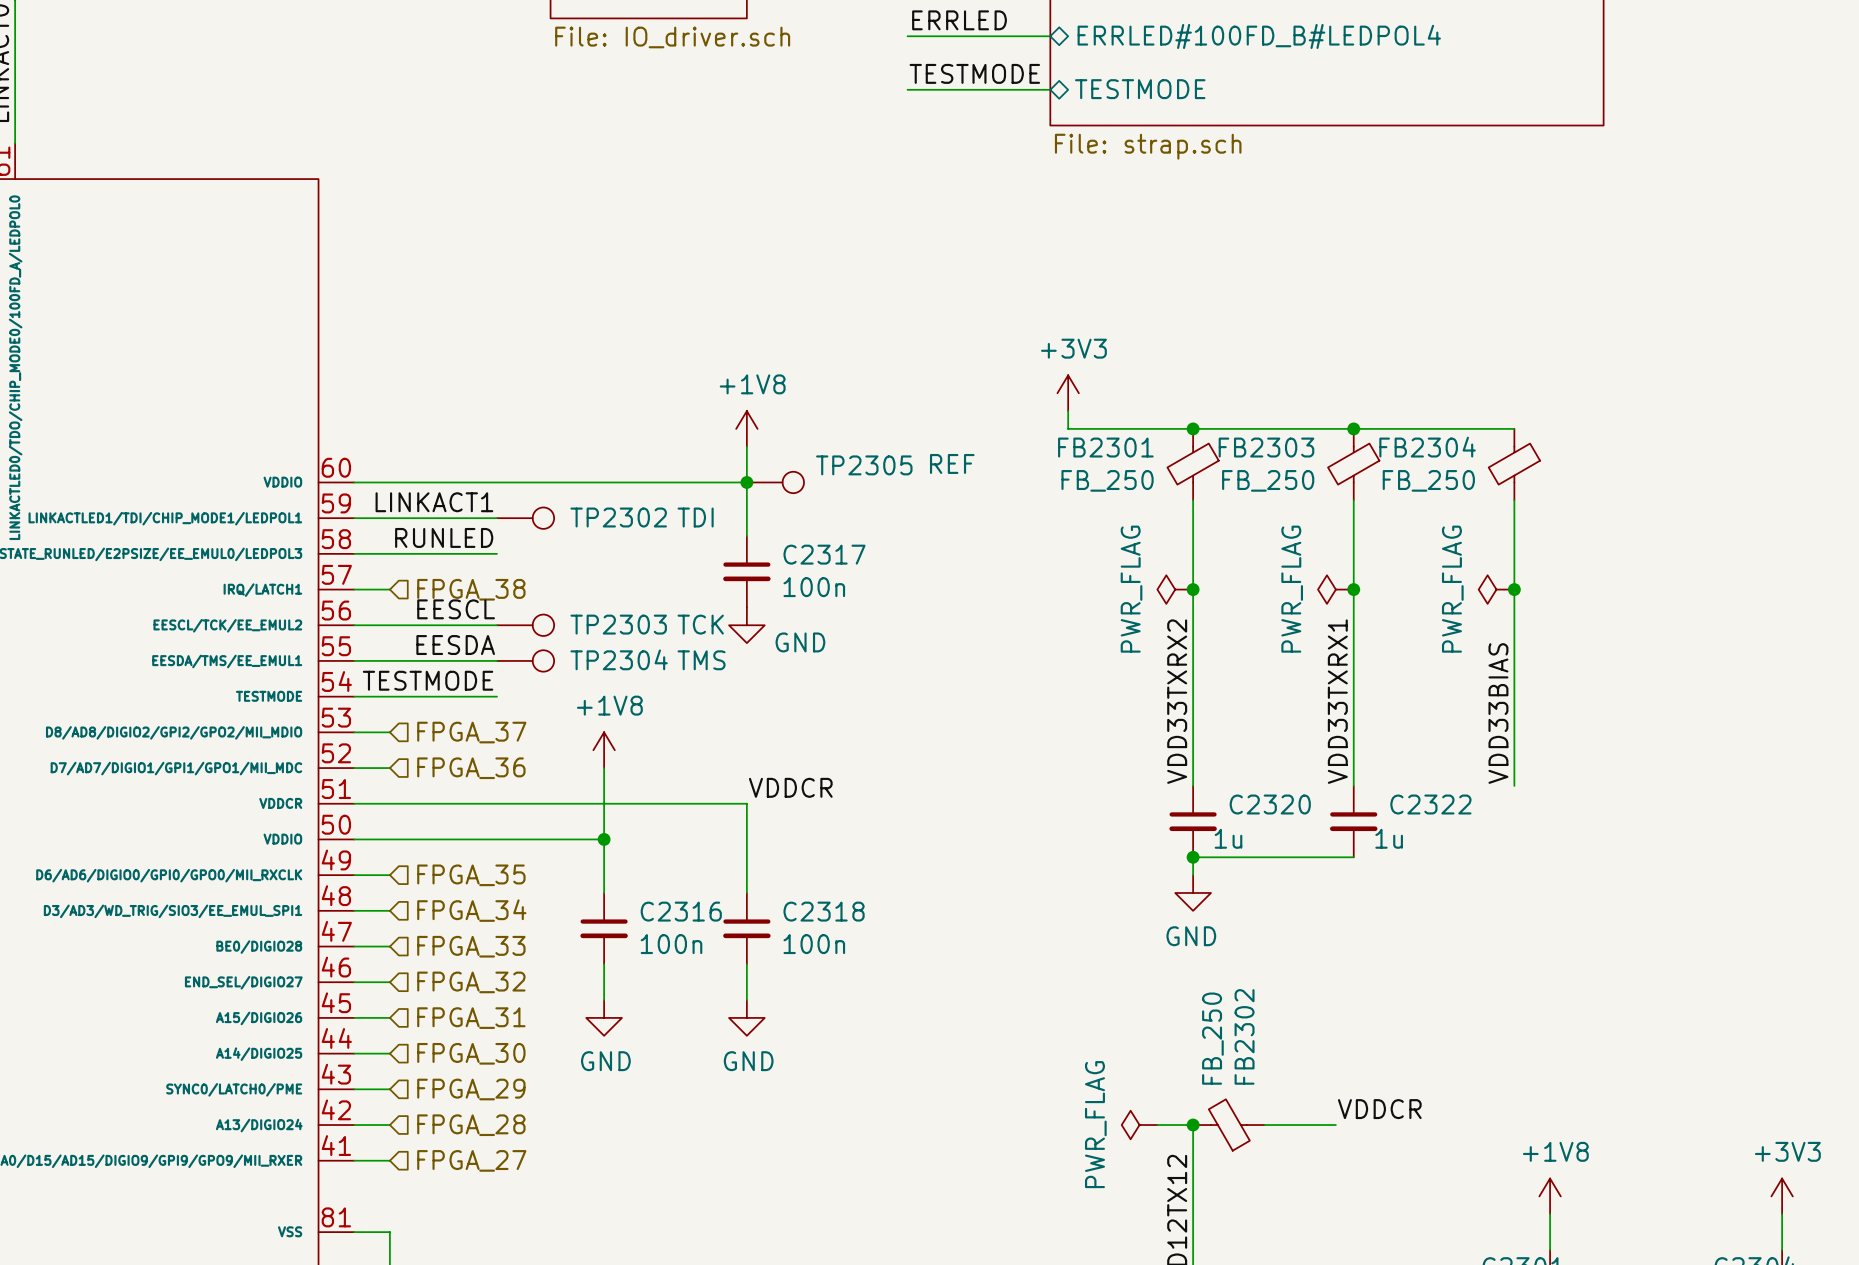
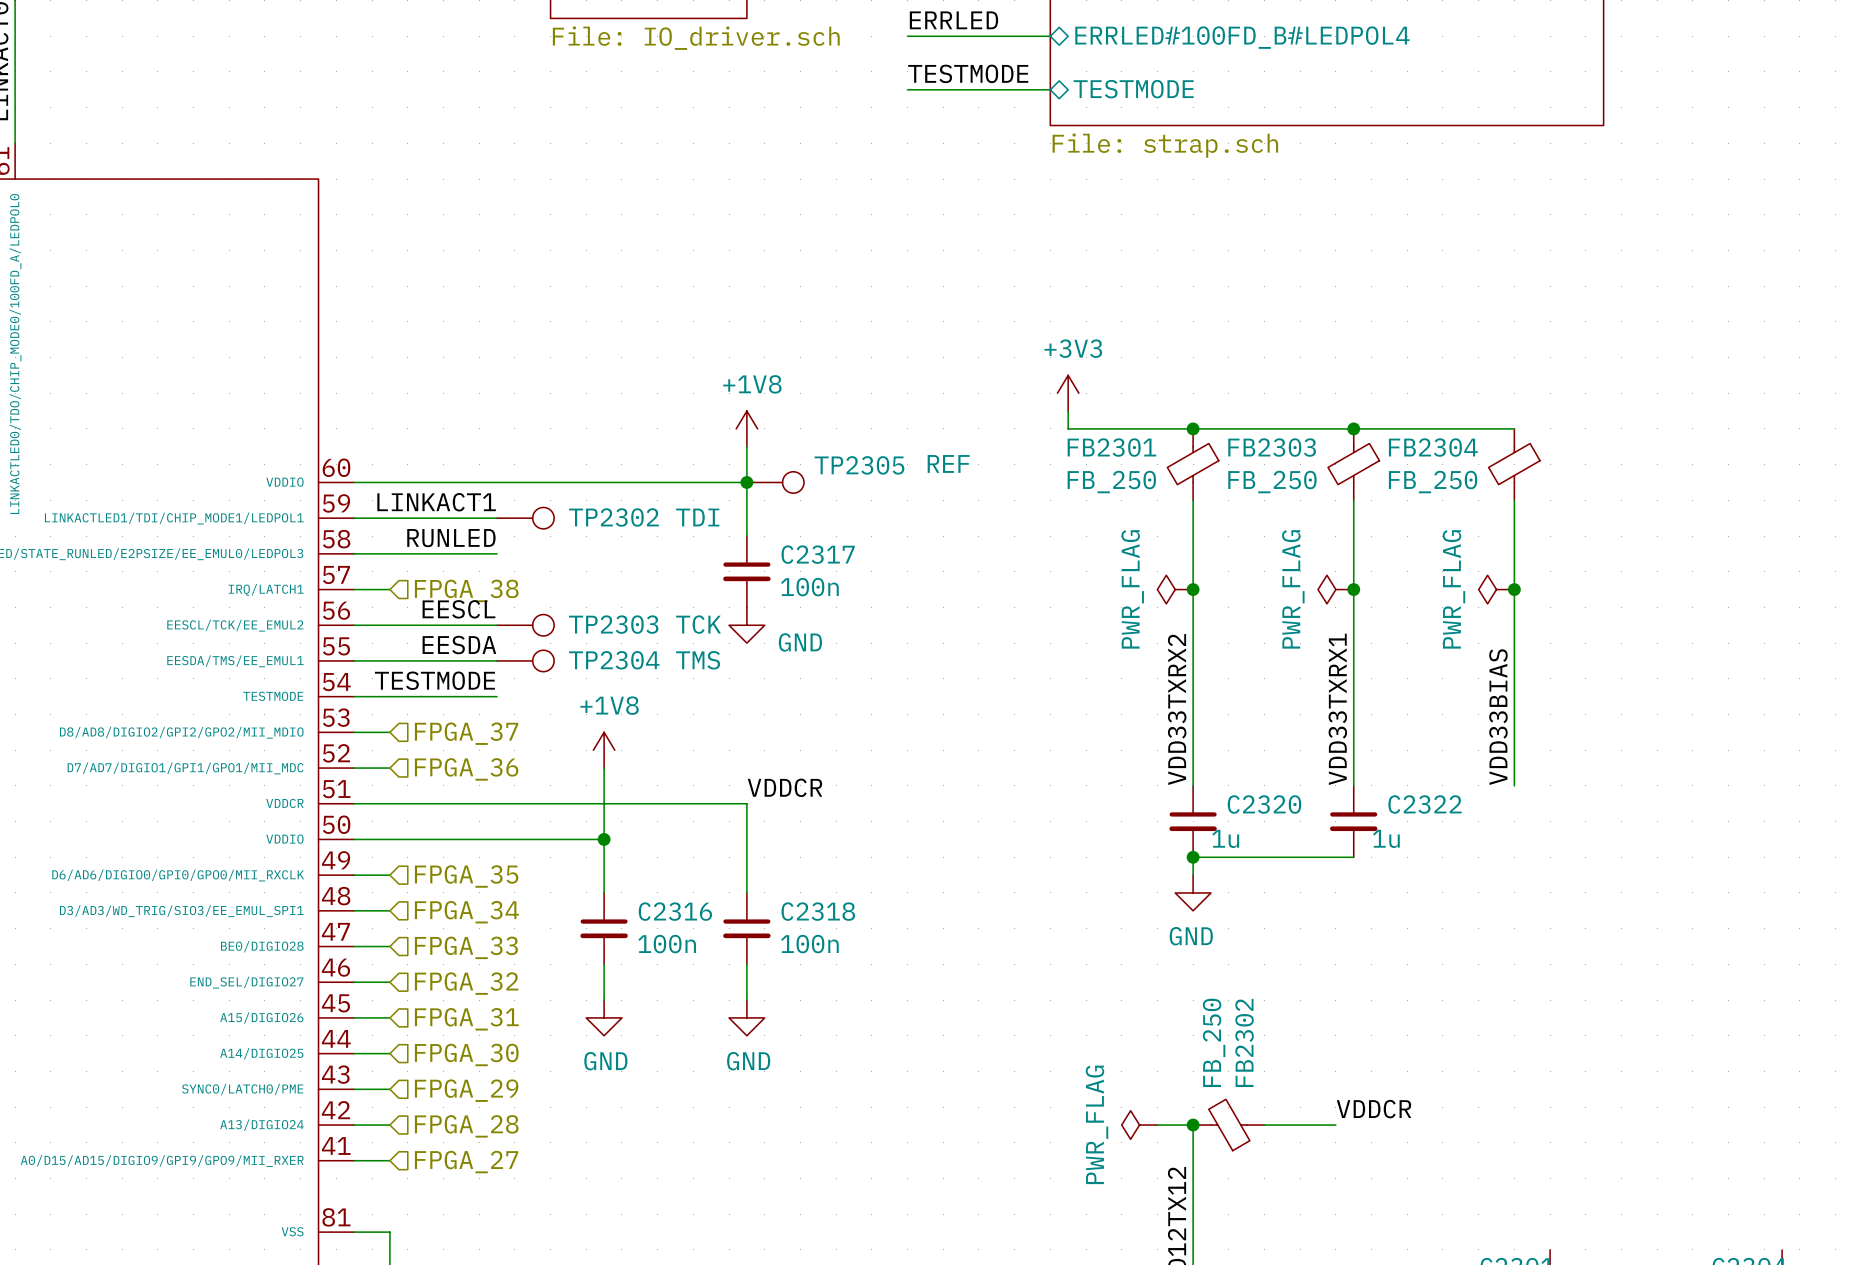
power symbol: +1V8 (1550, 1196) -> none
power symbol: +3V3 (1782, 1196) -> none
wire: (1550, 1214) (1550, 1249) -> none
wire: (1782, 1214) (1782, 1249) -> none

